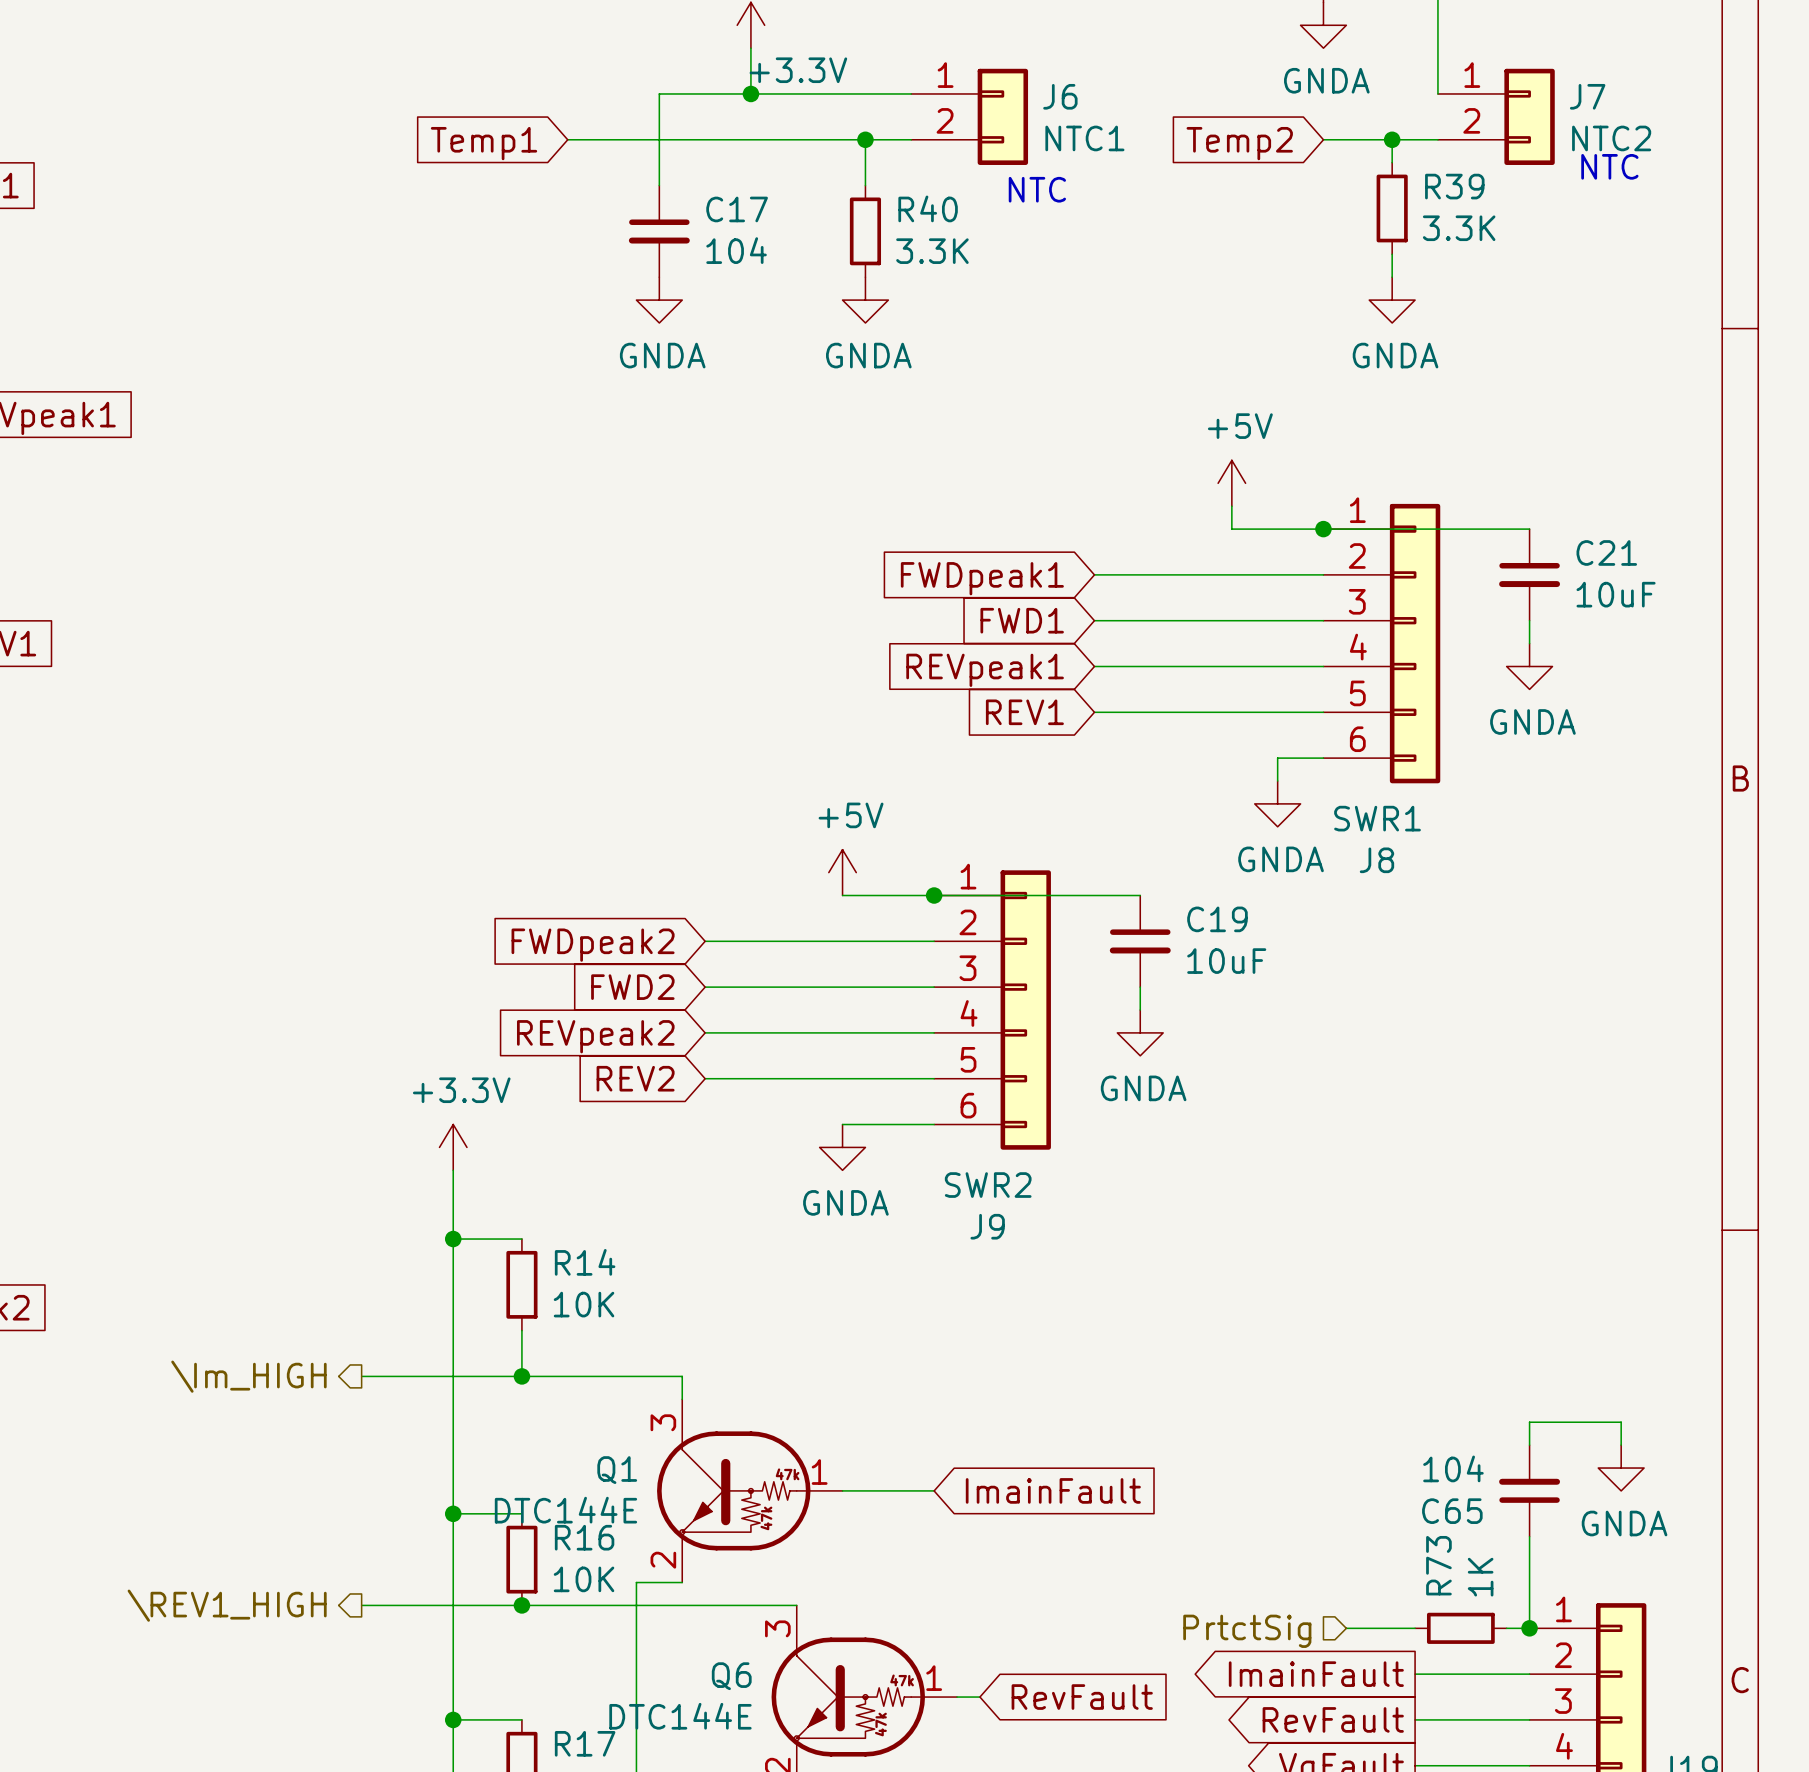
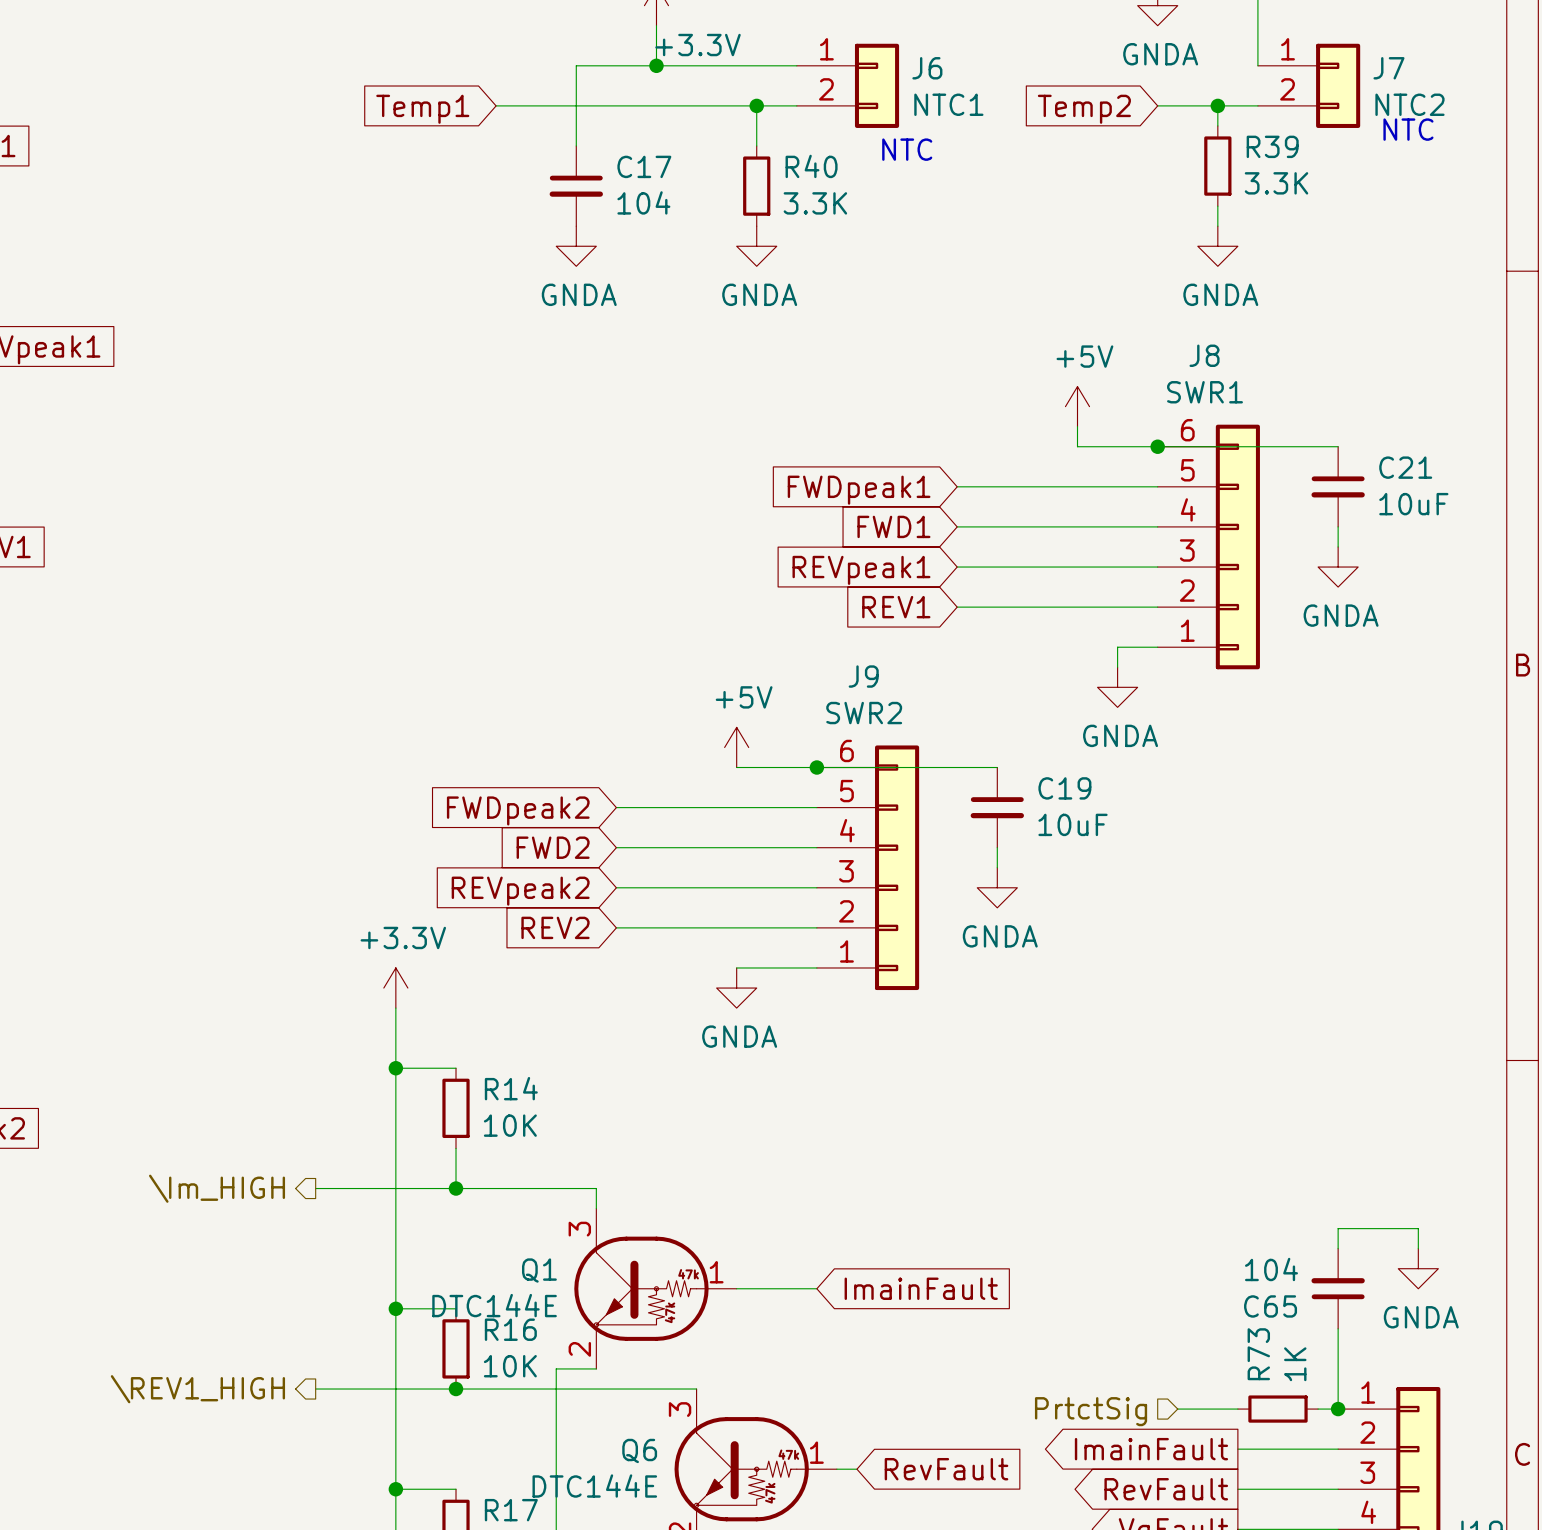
J8 flip: as is (1415, 643) -> up-down (1237, 546)
J9 flip: as is (1025, 1010) -> up-down (897, 867)

